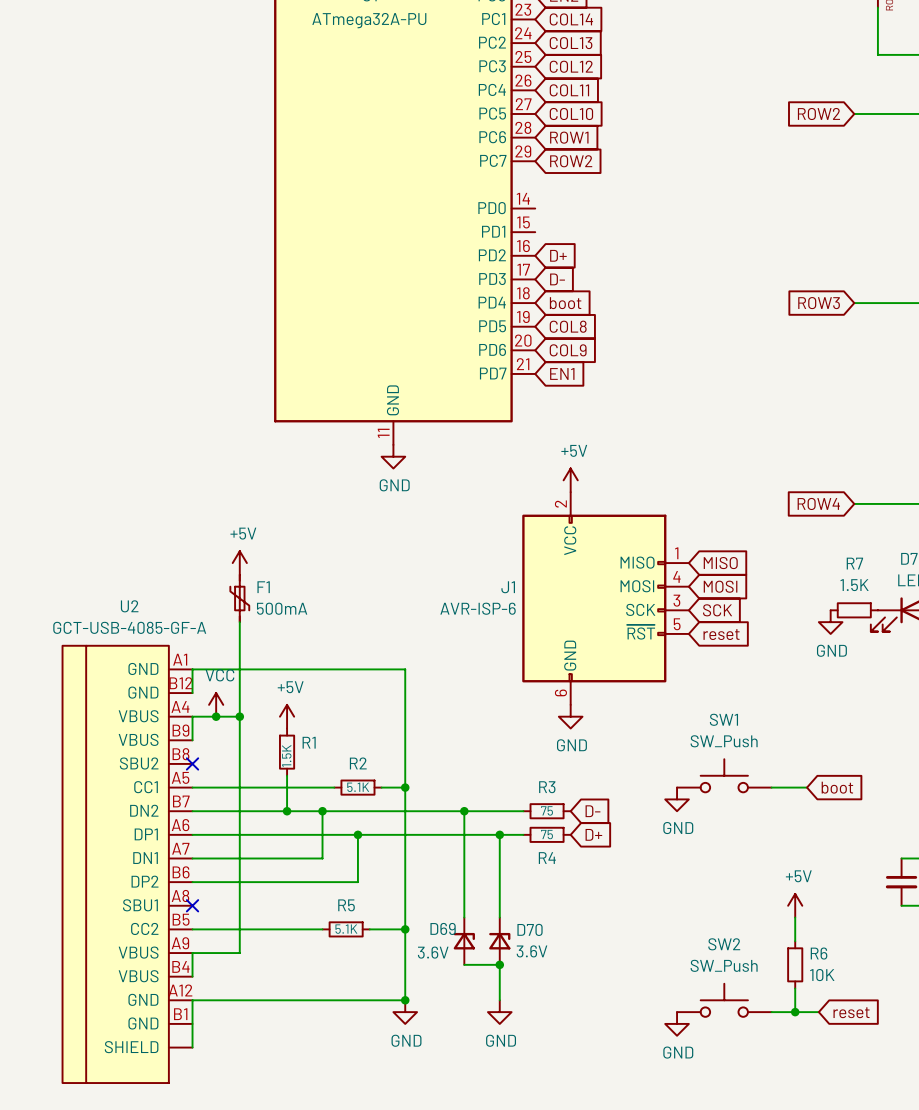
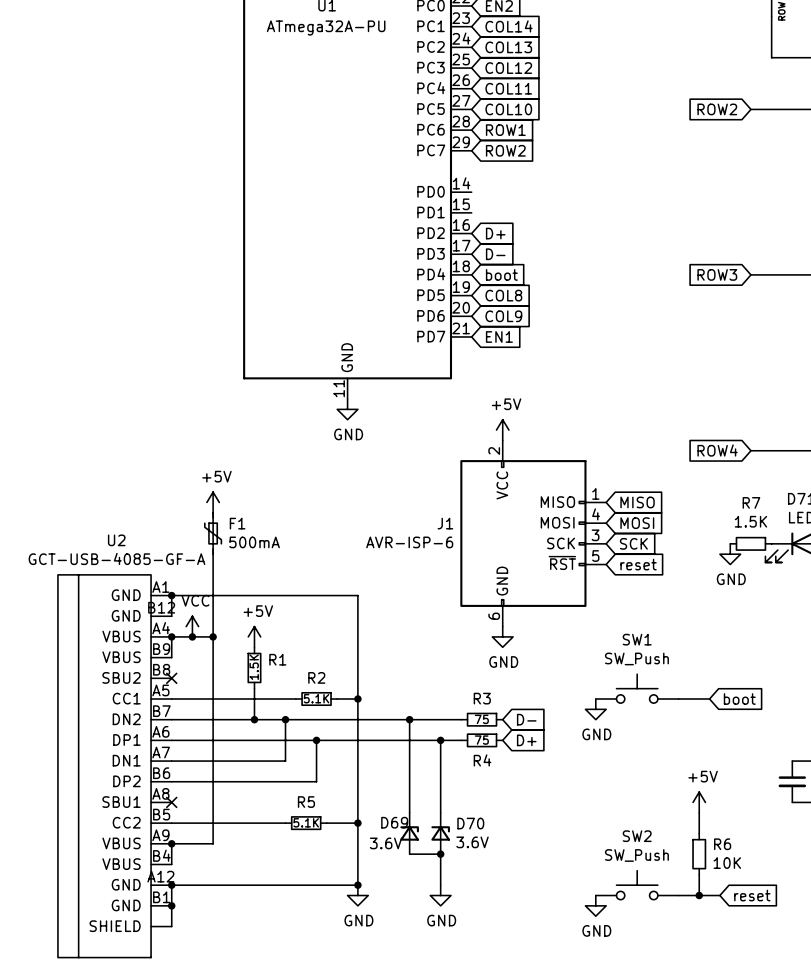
junction: none -> (171, 595)
junction: none -> (171, 636)
junction: none -> (171, 843)
junction: none -> (171, 885)
junction: none -> (171, 905)

